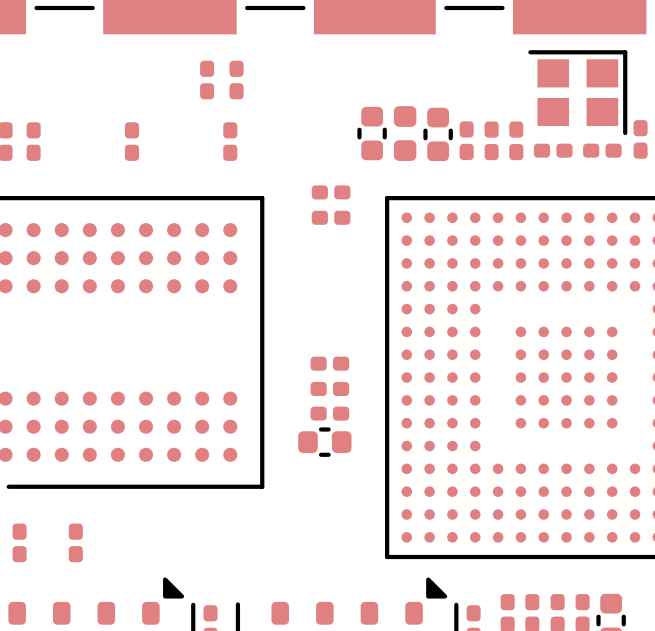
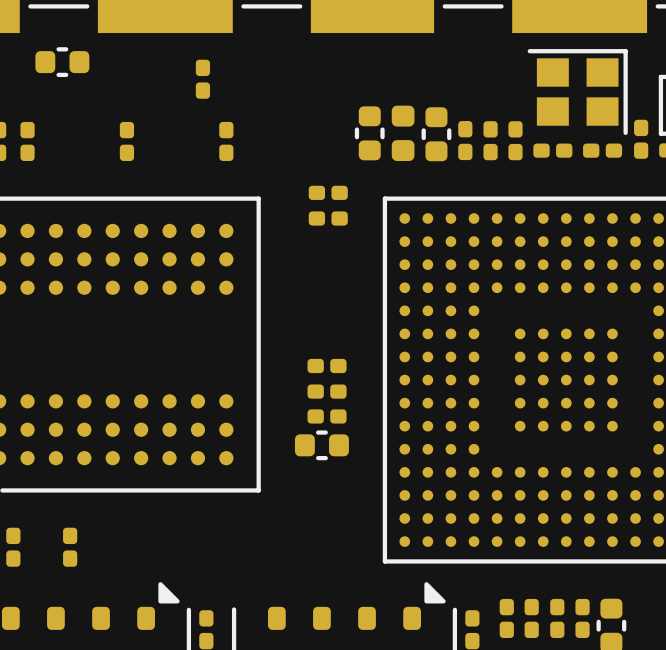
part: none -> (62, 62)
part: (236, 80) -> none

